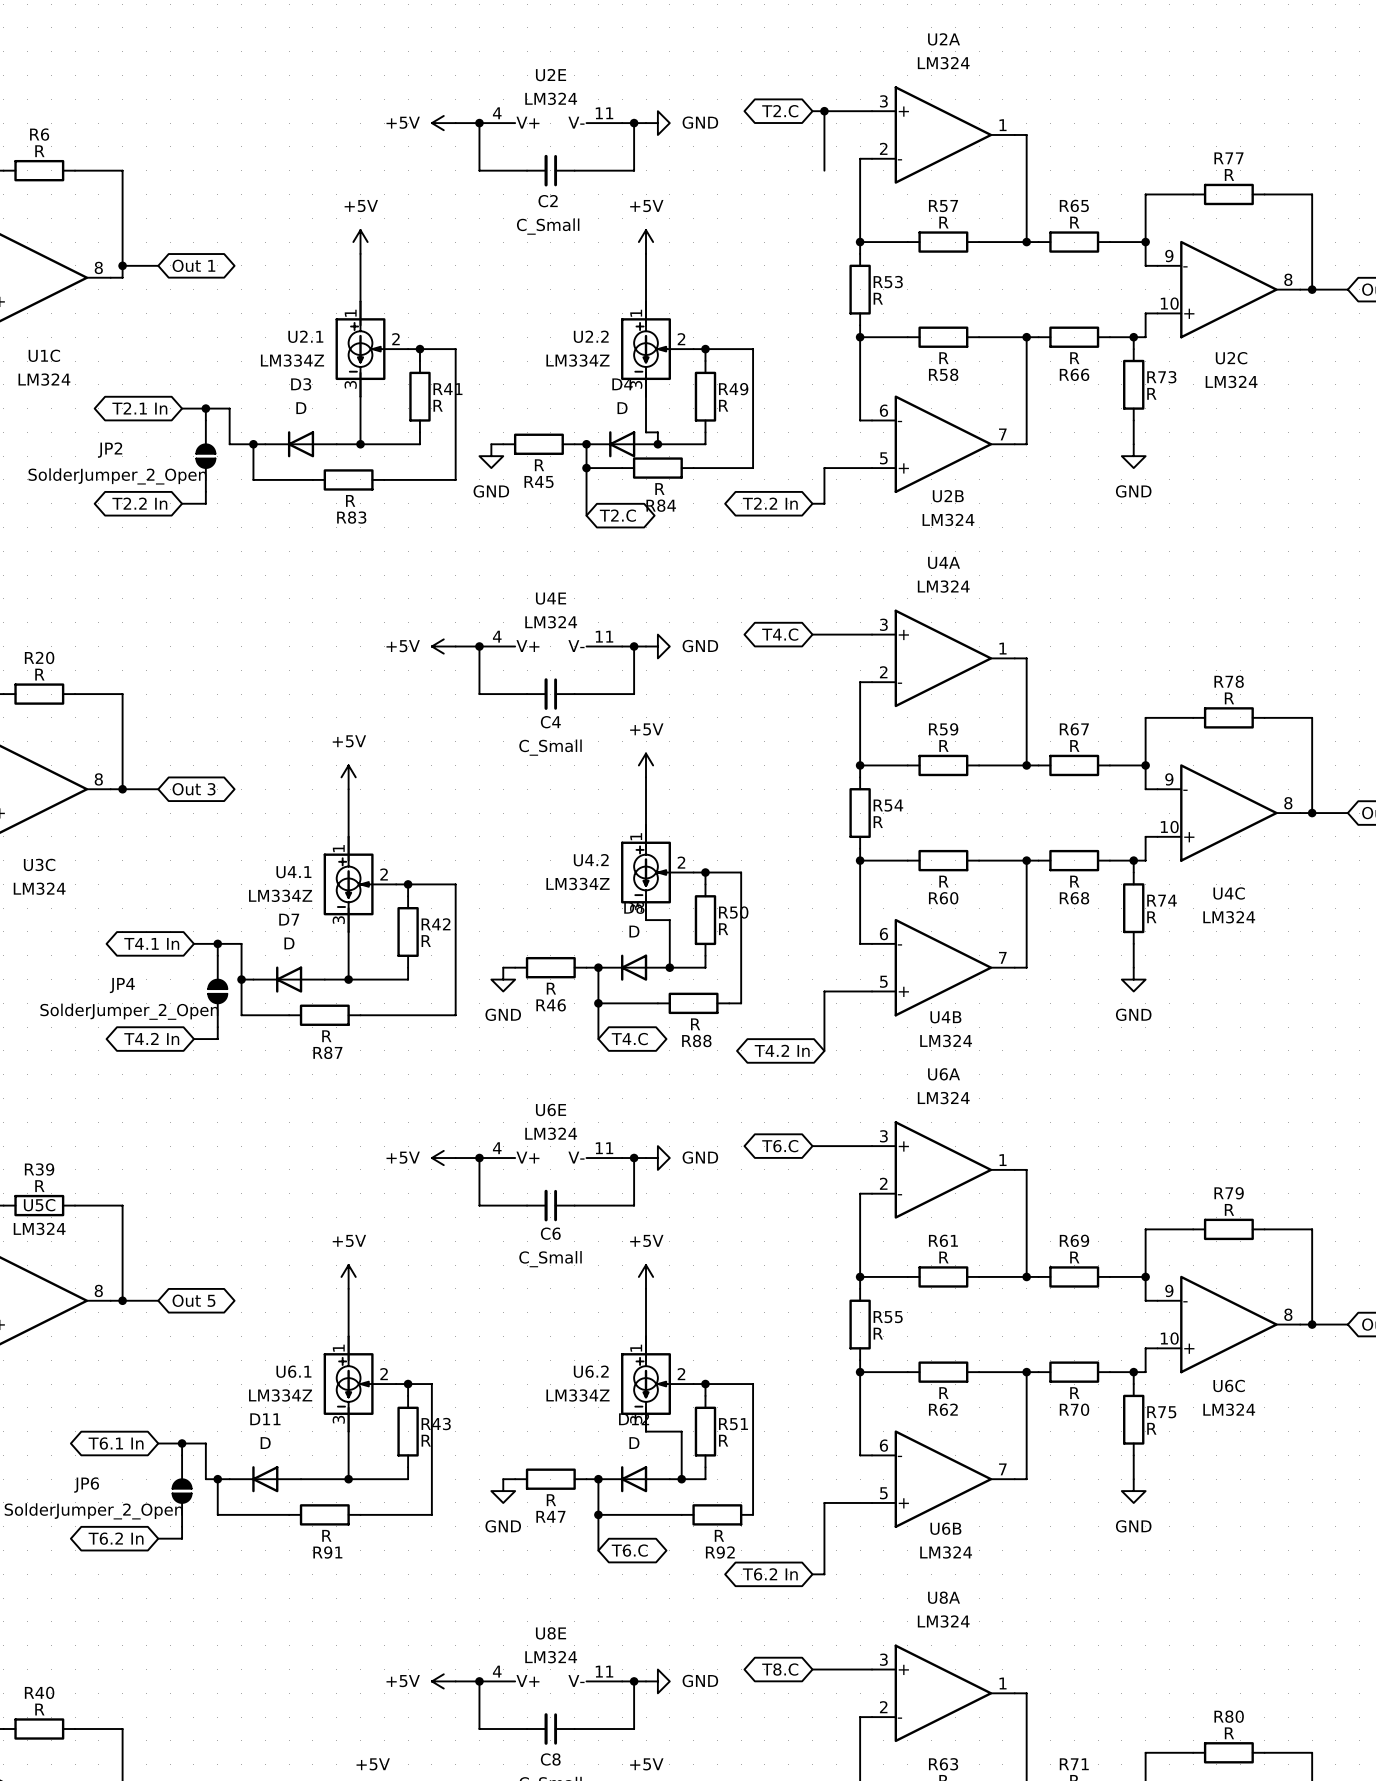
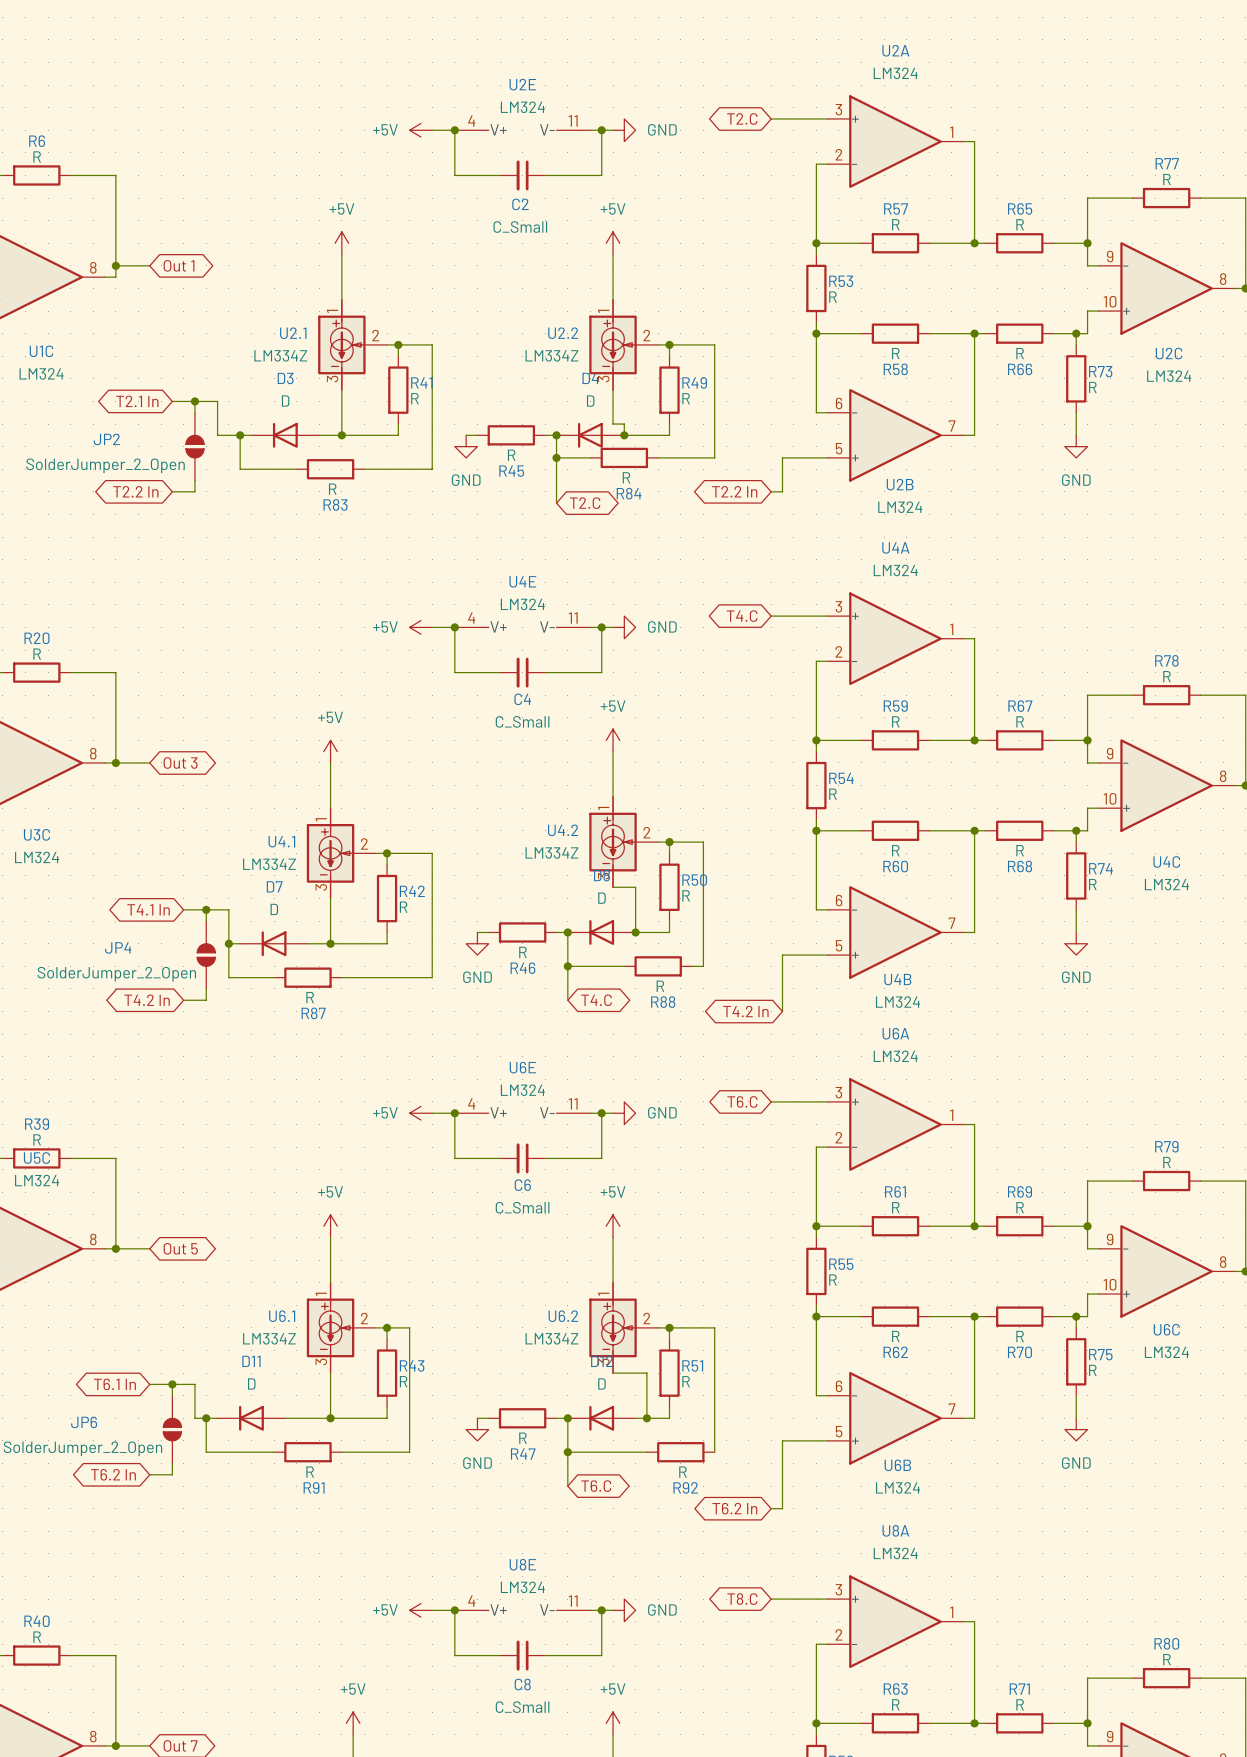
wire: (824, 111) (824, 170) -> none
junction: (824, 111) -> none

